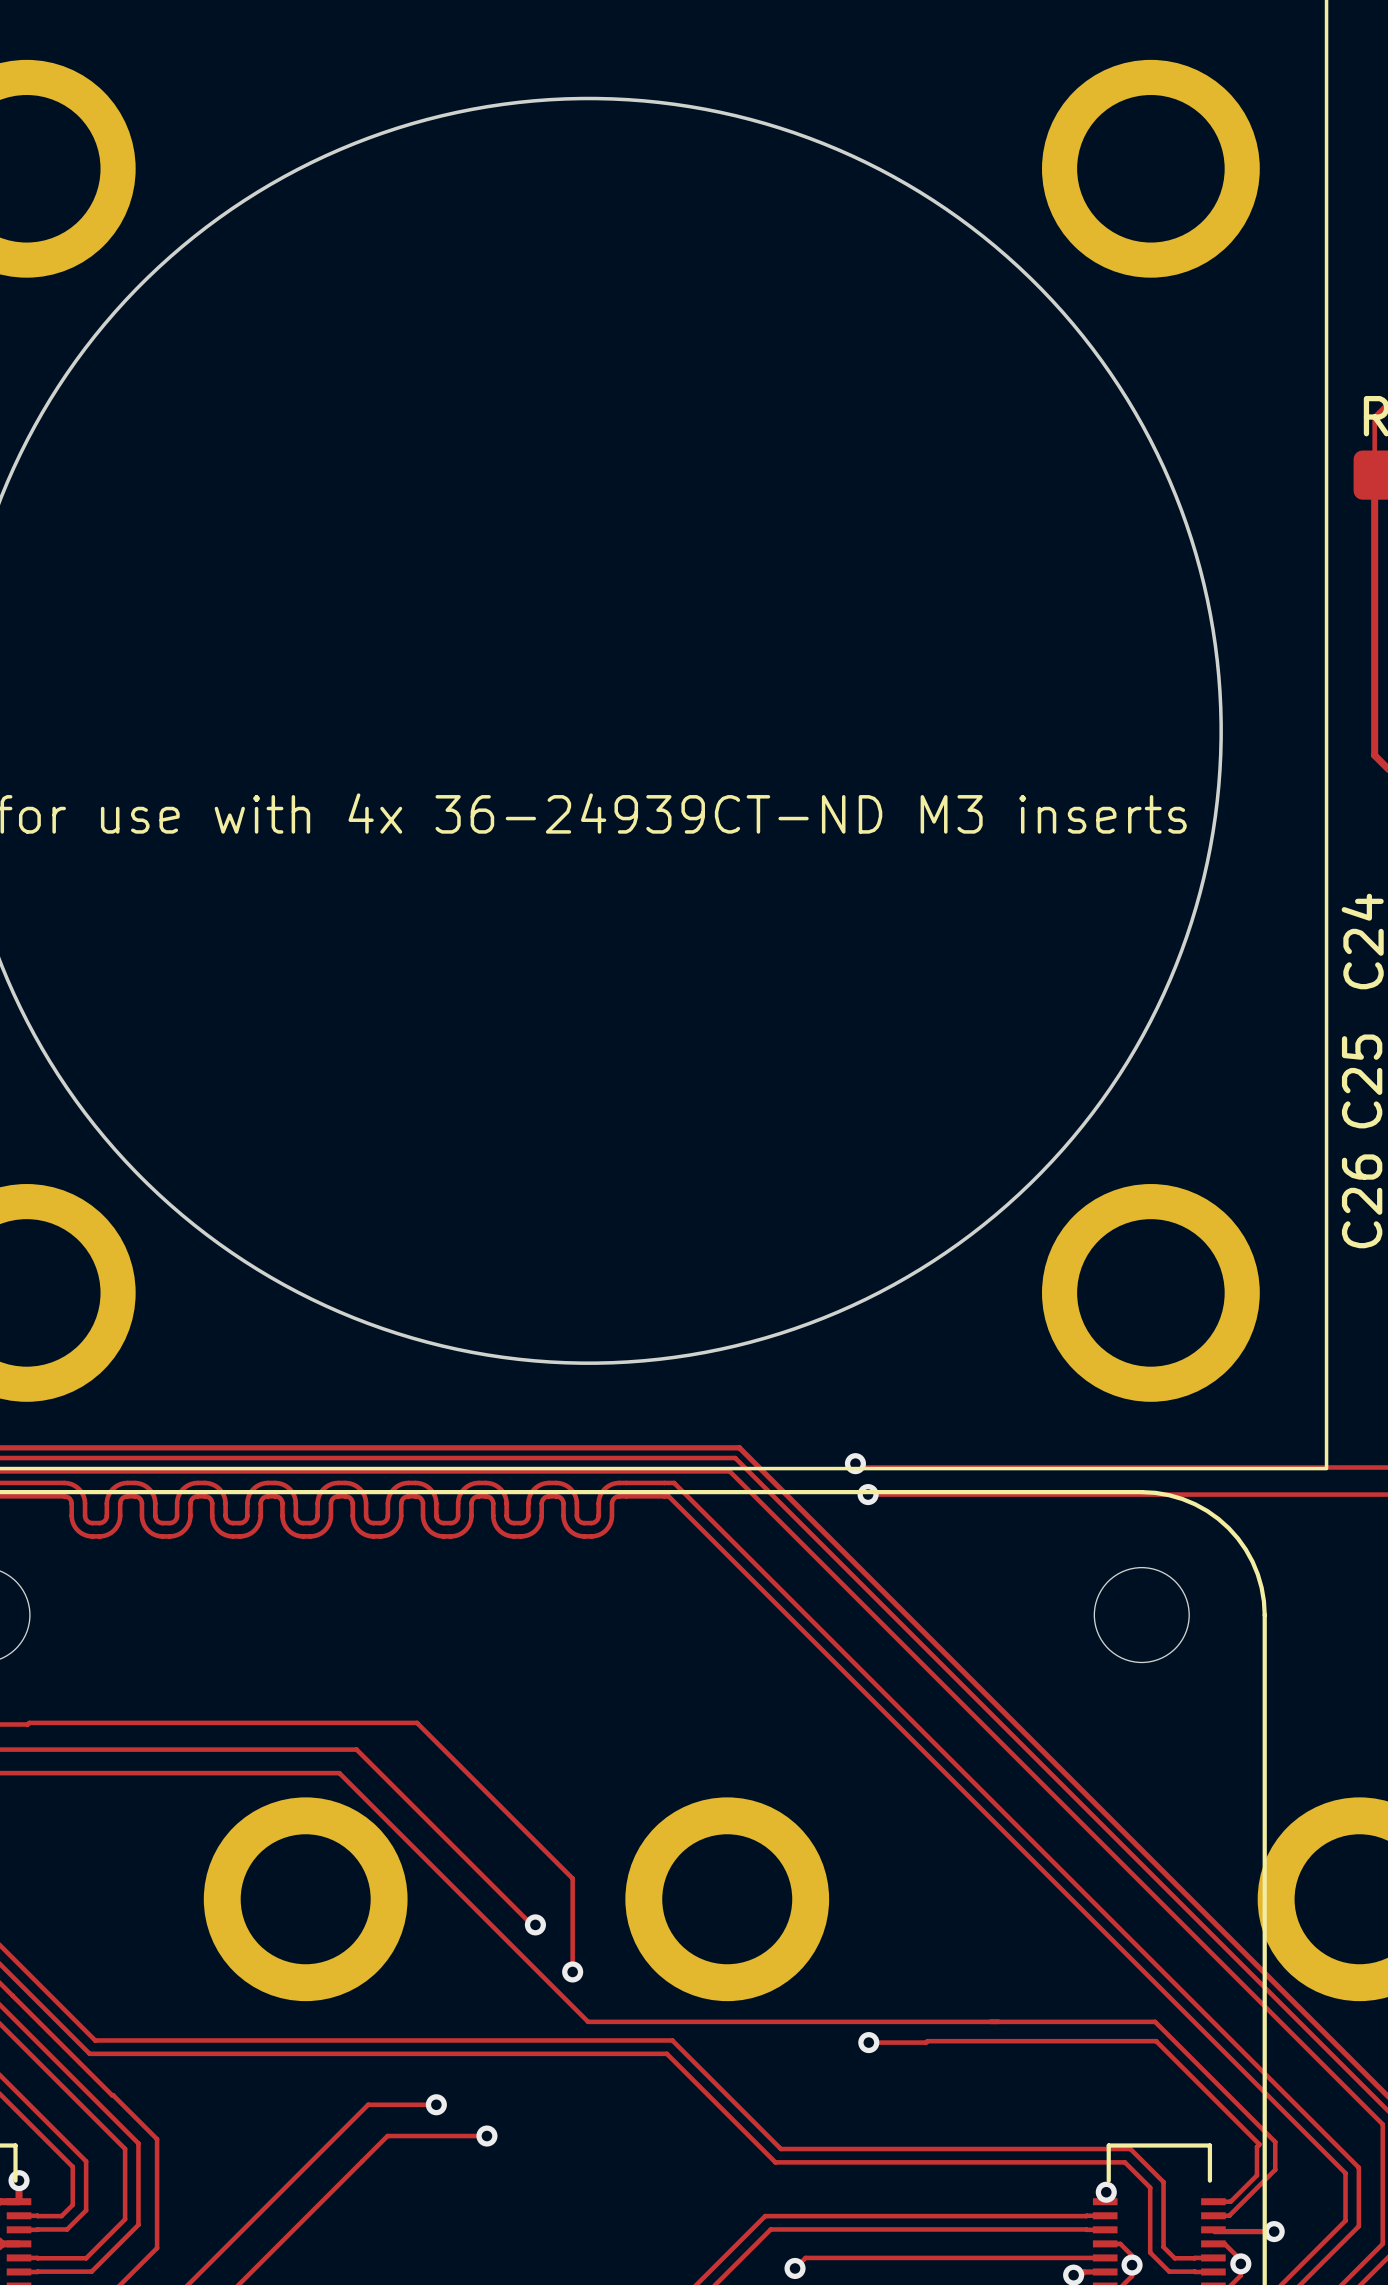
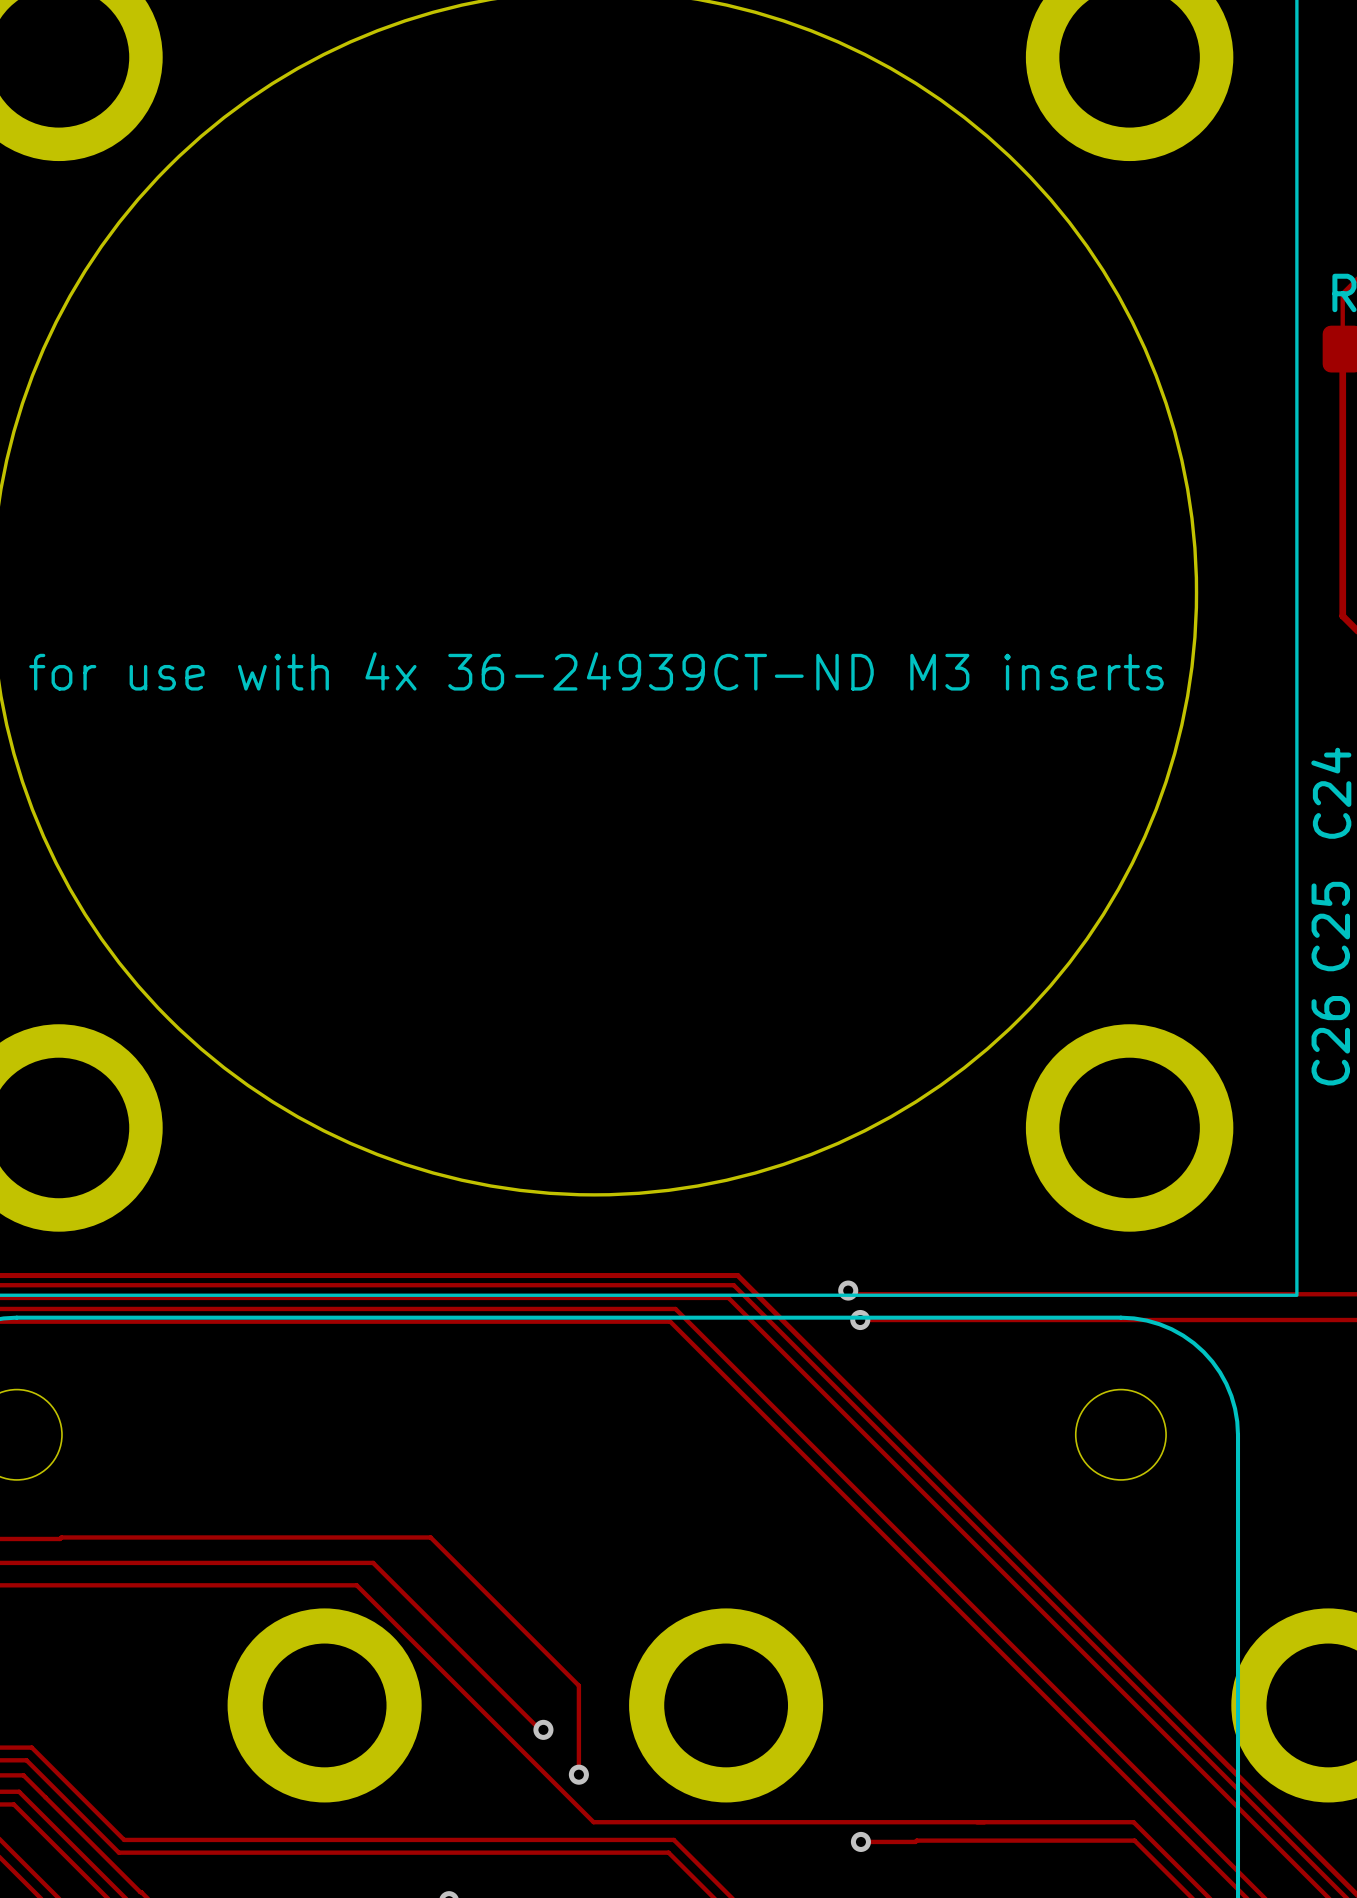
track: (64, 1482) (74, 1485) (80, 1491) (84, 1500) (85, 1518) (92, 1523) (101, 1522) (105, 1520) (109, 1493) (117, 1485) (127, 1482) -> (94, 1308) (154, 1308)
track: (134, 1482) (142, 1484) (151, 1491) (155, 1500) (155, 1518) (162, 1523) (171, 1522) (175, 1520) (179, 1493) (187, 1485) (197, 1482) -> (161, 1308) (221, 1308)
track: (204, 1482) (212, 1484) (221, 1491) (225, 1500) (226, 1518) (232, 1523) (241, 1522) (245, 1520) (250, 1493) (257, 1485) (268, 1482) -> (228, 1308) (288, 1308)
track: (275, 1482) (285, 1485) (291, 1491) (295, 1500) (296, 1518) (303, 1523) (312, 1522) (316, 1520) (320, 1493) (327, 1485) (338, 1482) -> (295, 1308) (355, 1308)
track: (345, 1482) (353, 1484) (361, 1491) (365, 1500) (366, 1518) (373, 1523) (382, 1522) (386, 1520) (390, 1493) (398, 1485) (408, 1482) -> (362, 1308) (422, 1308)
track: (415, 1482) (423, 1484) (432, 1491) (436, 1500) (436, 1518) (443, 1523) (452, 1522) (456, 1520) (460, 1493) (468, 1485) (478, 1482) -> (429, 1308) (489, 1308)
track: (485, 1482) (496, 1485) (502, 1491) (506, 1500) (507, 1518) (513, 1523) (522, 1522) (526, 1520) (531, 1493) (538, 1485) (549, 1482) -> (496, 1308) (556, 1308)
track: (556, 1482) (566, 1485) (572, 1491) (576, 1500) (577, 1518) (584, 1523) (593, 1522) (597, 1520) (601, 1493) (609, 1485) (619, 1482) -> (563, 1308) (623, 1308)
track: (64, 1496) (71, 1500) (71, 1518) (75, 1528) (82, 1533) (92, 1536) (107, 1534) (115, 1528) (120, 1518) (120, 1500) (127, 1496) -> (94, 1321) (154, 1321)
track: (134, 1496) (141, 1500) (142, 1518) (146, 1528) (154, 1534) (162, 1536) (177, 1534) (186, 1528) (190, 1518) (191, 1500) (197, 1496) -> (161, 1321) (221, 1321)
track: (204, 1496) (211, 1500) (212, 1518) (216, 1528) (225, 1534) (232, 1536) (247, 1534) (256, 1528) (260, 1518) (261, 1500) (268, 1496) -> (228, 1321) (288, 1321)
track: (275, 1496) (281, 1500) (282, 1518) (286, 1528) (295, 1534) (303, 1536) (318, 1534) (326, 1528) (330, 1518) (331, 1500) (338, 1496) -> (295, 1321) (355, 1321)
track: (345, 1496) (352, 1500) (352, 1518) (357, 1528) (365, 1534) (373, 1536) (388, 1534) (396, 1528) (401, 1518) (401, 1500) (408, 1496) -> (362, 1321) (422, 1321)
track: (415, 1496) (422, 1500) (423, 1518) (427, 1528) (435, 1534) (443, 1536) (458, 1534) (467, 1528) (471, 1518) (472, 1500) (478, 1496) -> (429, 1321) (489, 1321)
track: (485, 1496) (492, 1500) (493, 1518) (497, 1528) (506, 1534) (513, 1536) (528, 1534) (537, 1528) (541, 1518) (542, 1500) (549, 1496) -> (496, 1321) (556, 1321)
track: (556, 1496) (562, 1500) (563, 1518) (567, 1528) (576, 1534) (584, 1536) (599, 1534) (607, 1528) (611, 1518) (612, 1500) (619, 1496) -> (563, 1321) (623, 1321)

